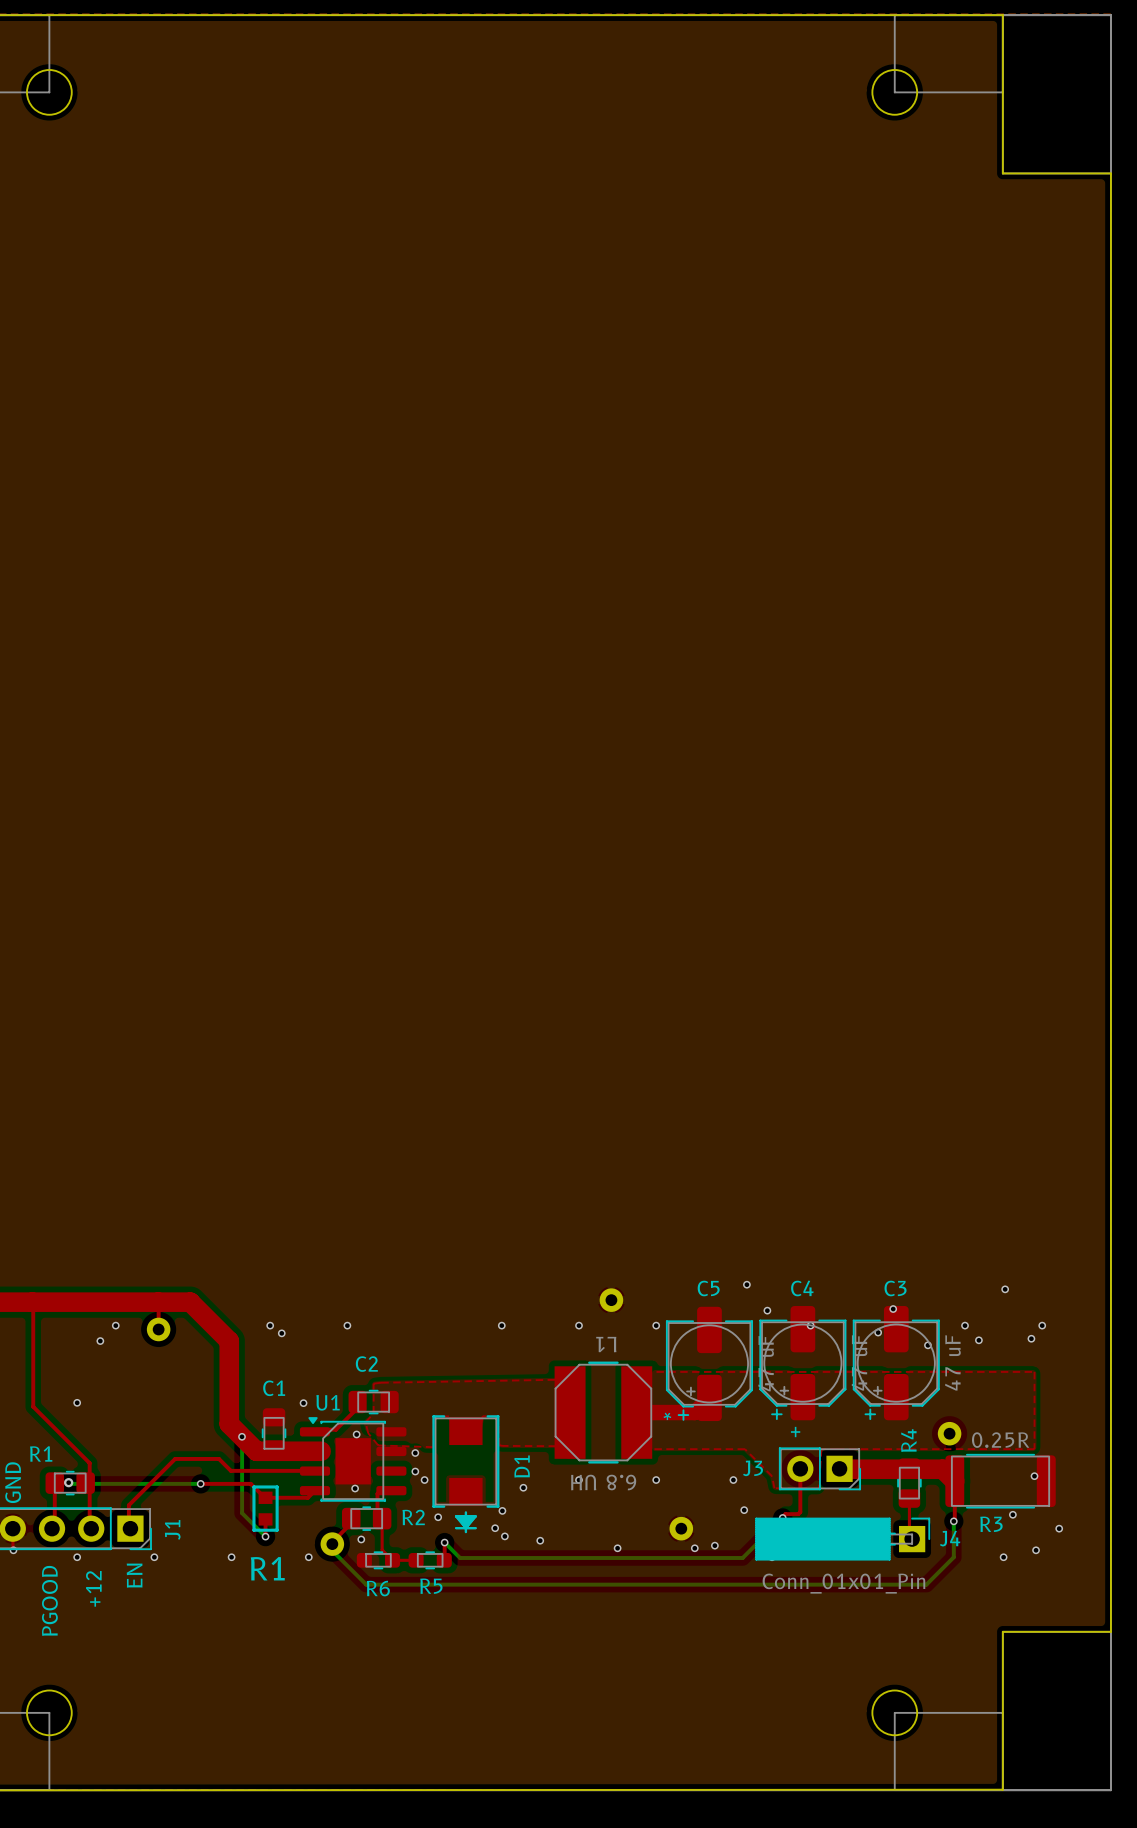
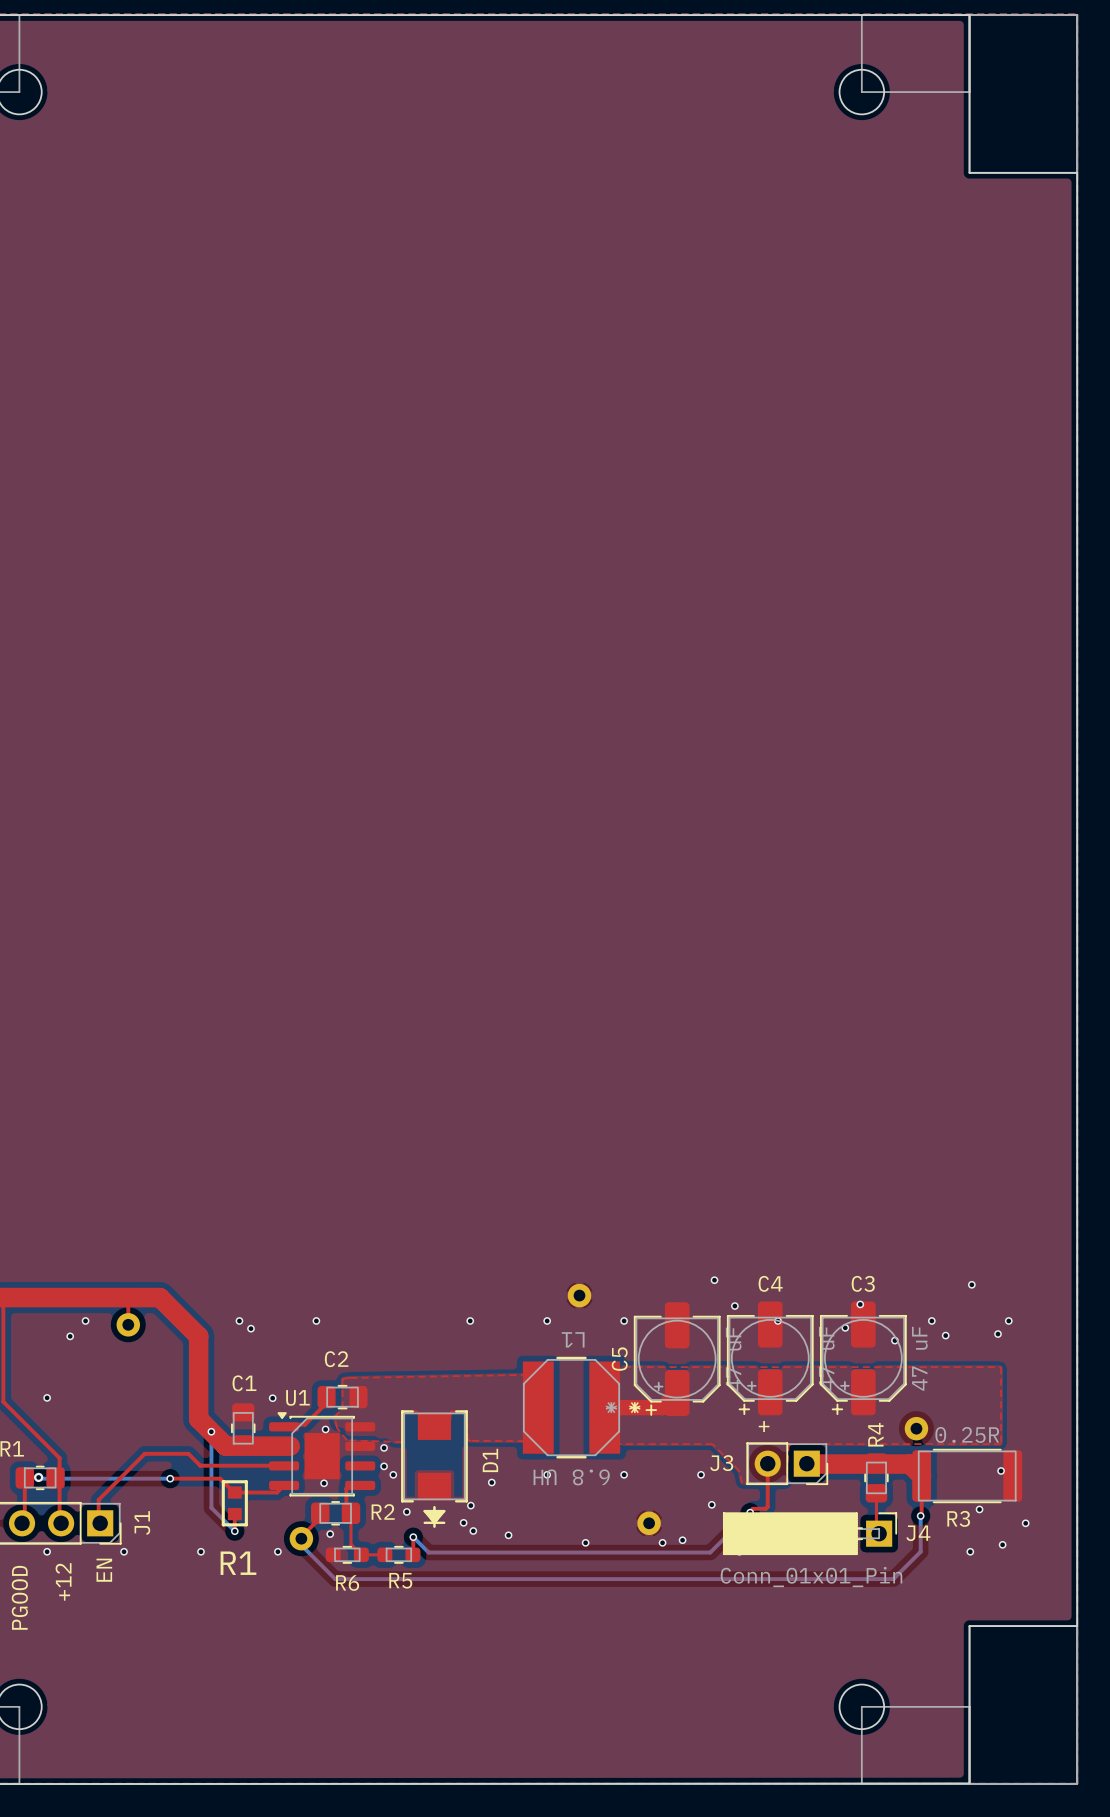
C5 name rotation: 0° (708, 1288) -> 90° counterclockwise (619, 1359)
C5 name position: C5 (708, 1288) -> C5 (619, 1359)
L1 footprint: [554, 1361, 653, 1464] -> [522, 1356, 621, 1459]

